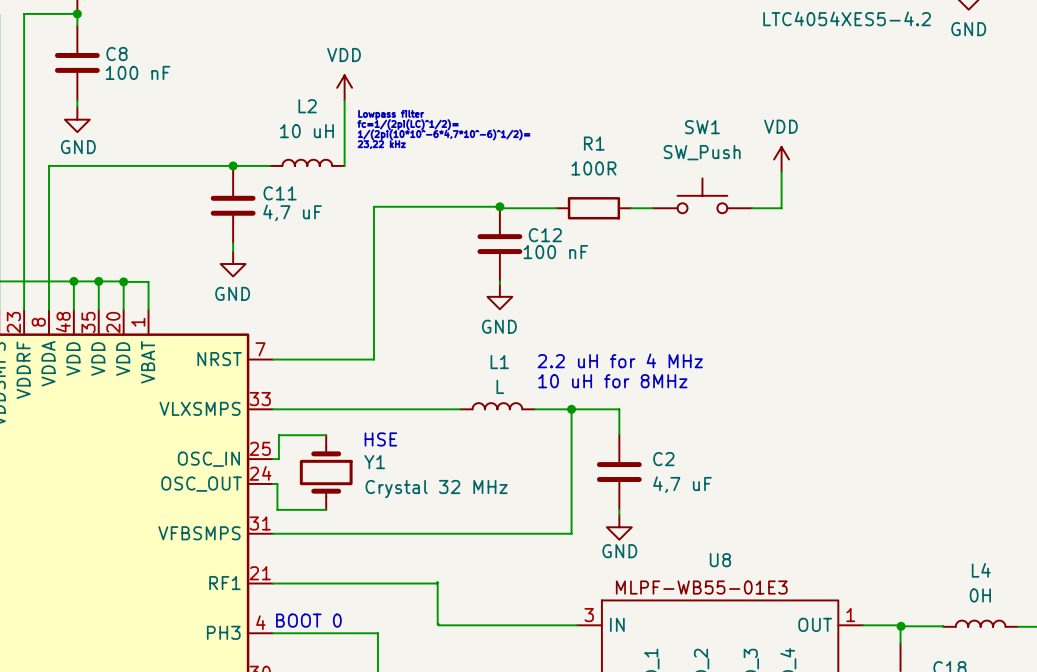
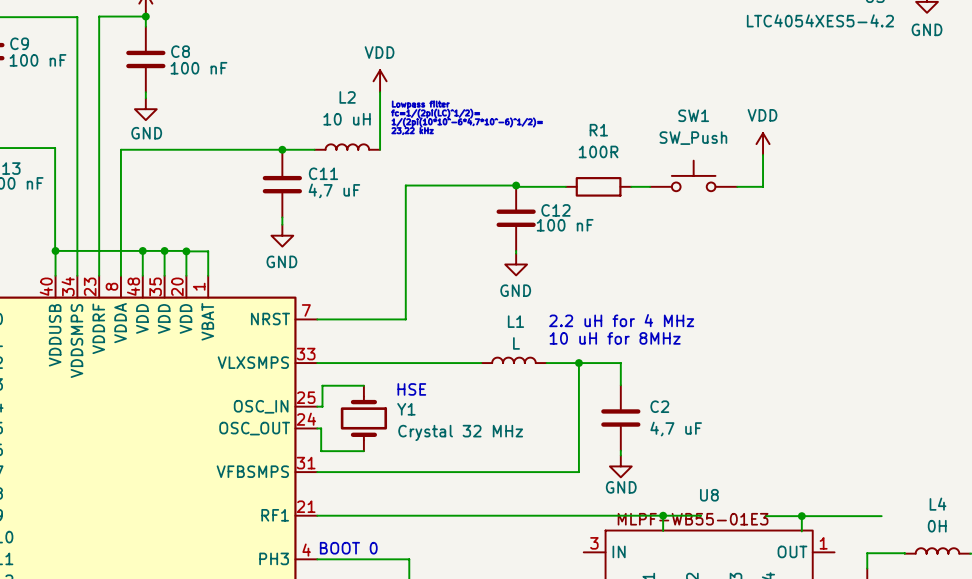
wire: (437, 583) (438, 625) (577, 625) -> (461, 515) (700, 516)
wire: none -> (663, 515) (663, 530)
junction: none -> (663, 515)
wire: none -> (766, 516) (881, 516)
wire: none -> (801, 516) (801, 531)
junction: none -> (801, 516)
wire: (863, 625) (901, 626) -> none
junction: (901, 626) -> none

